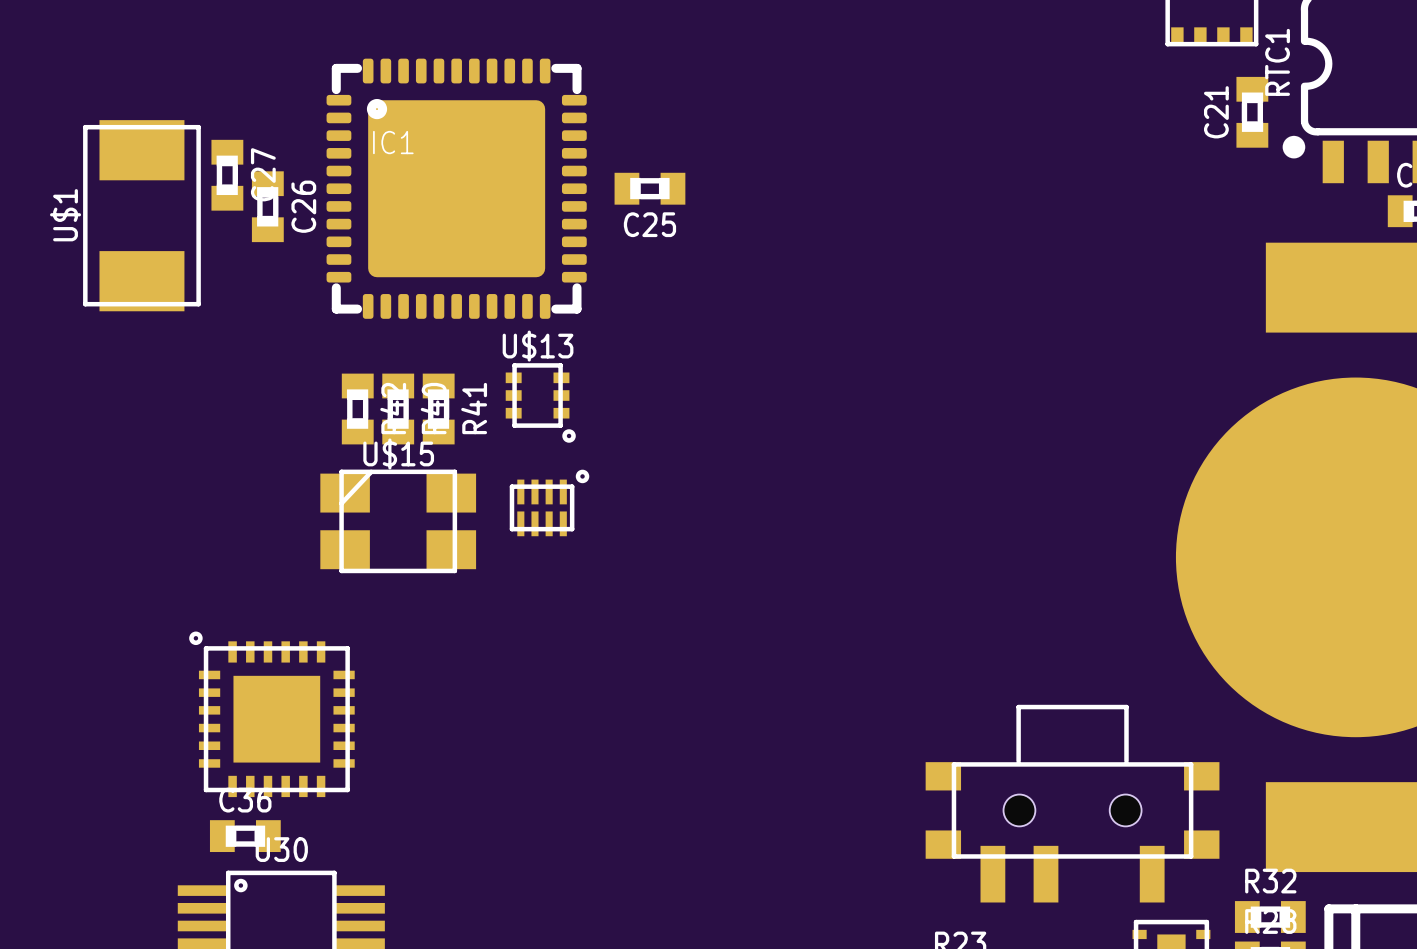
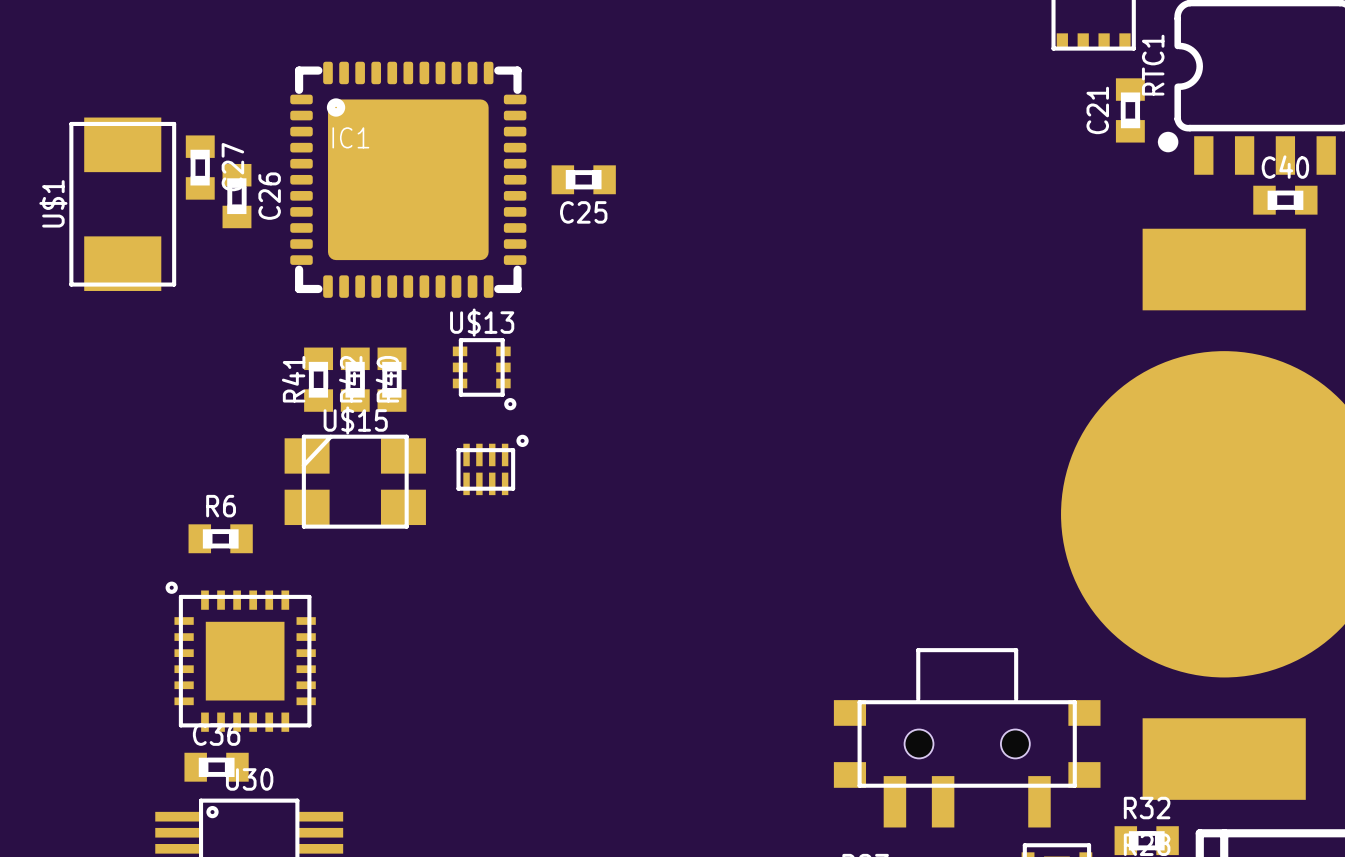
R41 name position: R41 (474, 408) -> R41 (293, 379)
R6: none -> (220, 538)

